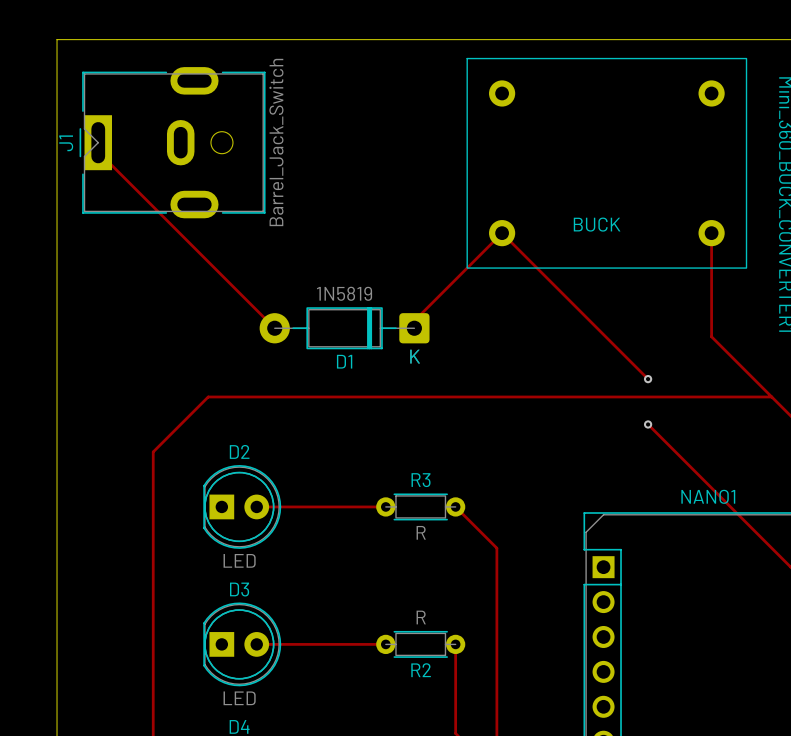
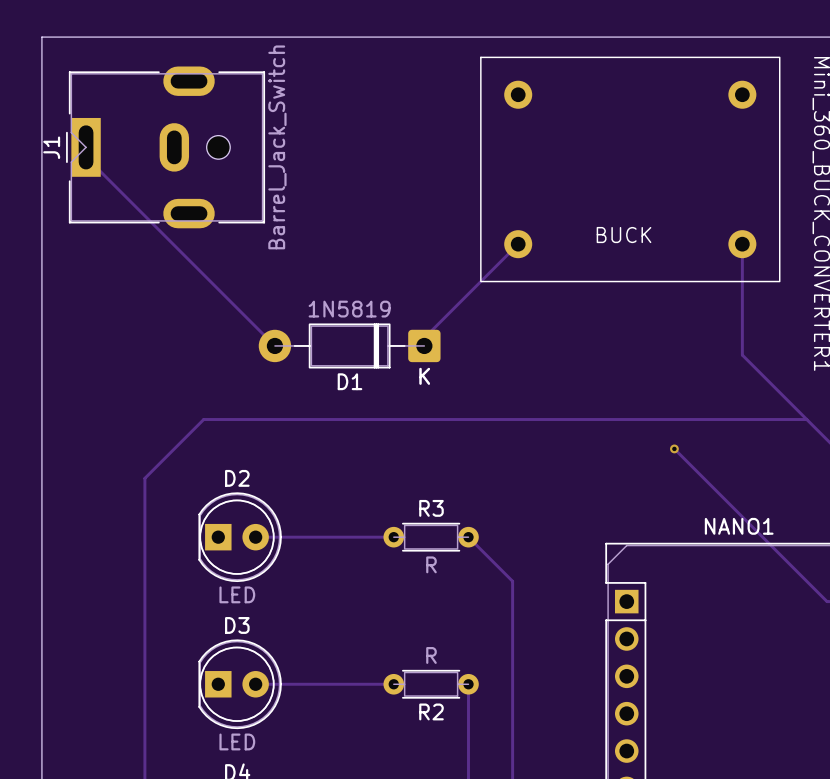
track: (502, 233) (648, 379) -> none
via: (648, 379) -> none

